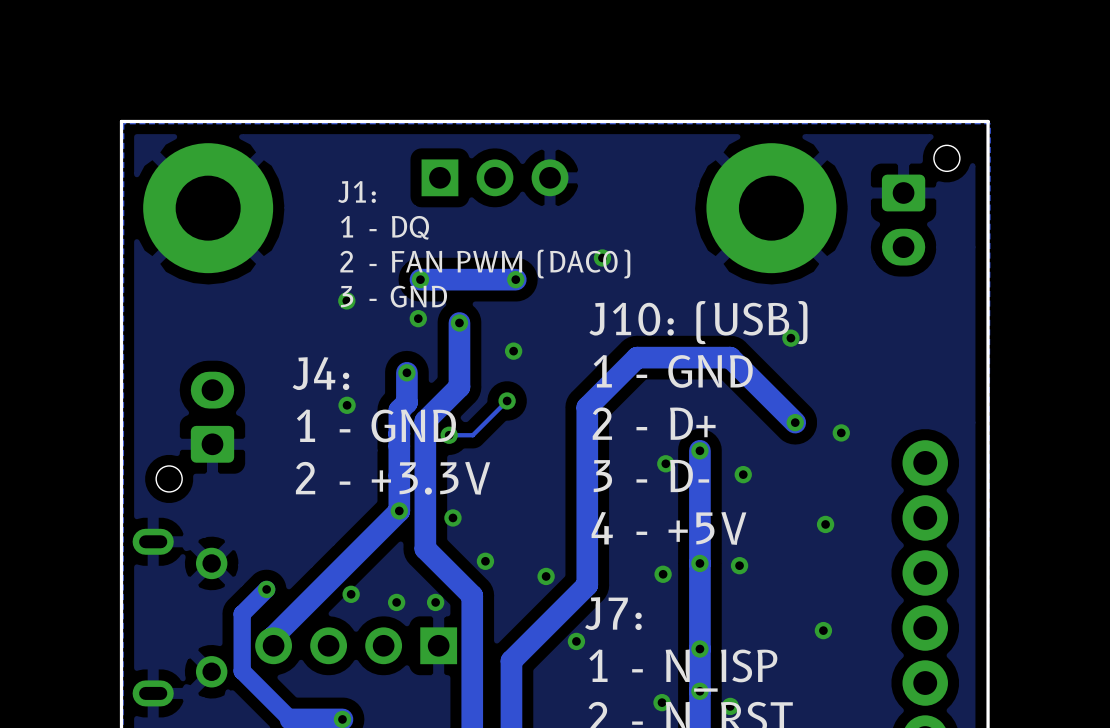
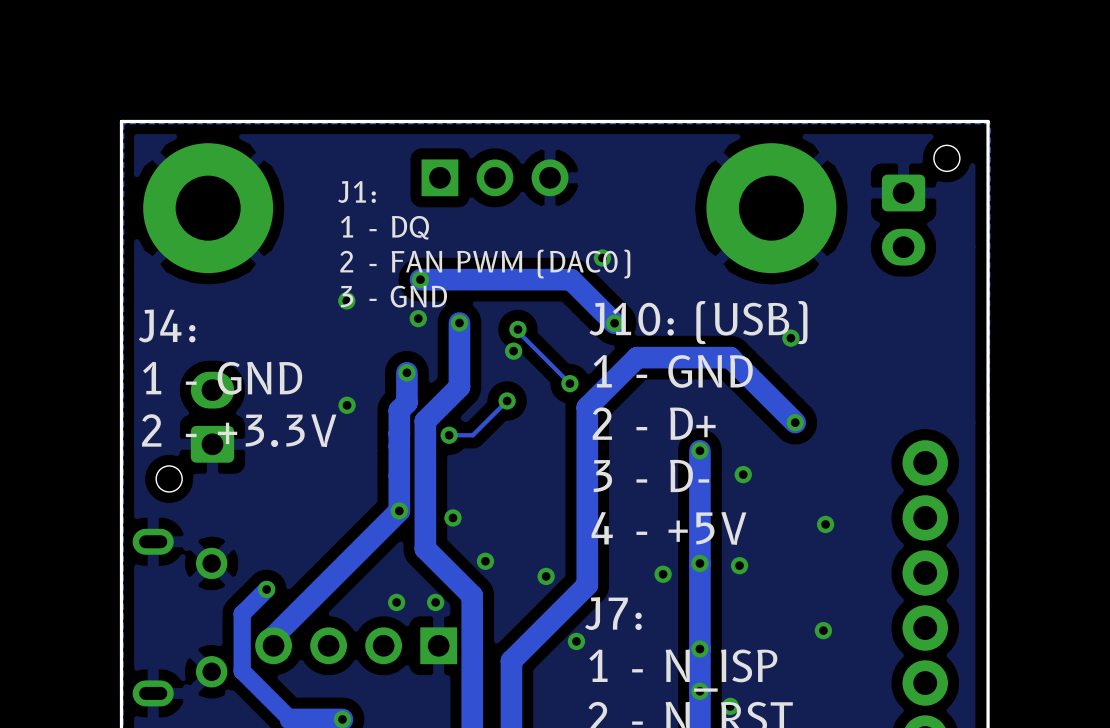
track: none -> (515, 279) (571, 279) (614, 323)
via position: (515, 279) -> (517, 329)
via: none -> (614, 323)
track: none -> (517, 329) (517, 331) (569, 383)
text position: J4: (320, 373) -> J4: (167, 325)
via: none -> (569, 383)
text position: 1 - GND (376, 425) -> 1 - GND (222, 378)
via: (841, 432) -> none
via: (665, 463) -> none
text position: 2 - +3.3V (393, 478) -> 2 - +3.3V (239, 430)
via: (351, 594) -> none
via: (662, 702) -> none

